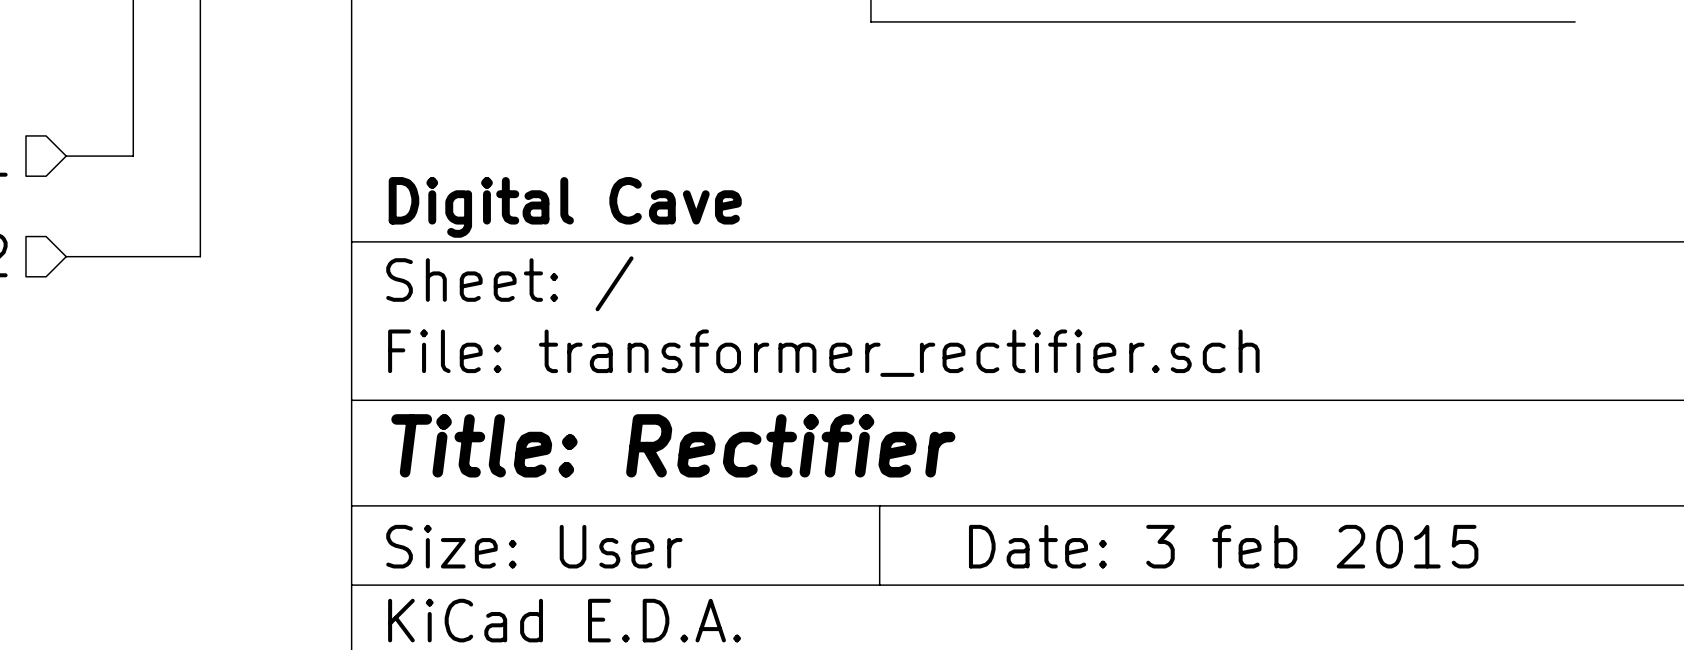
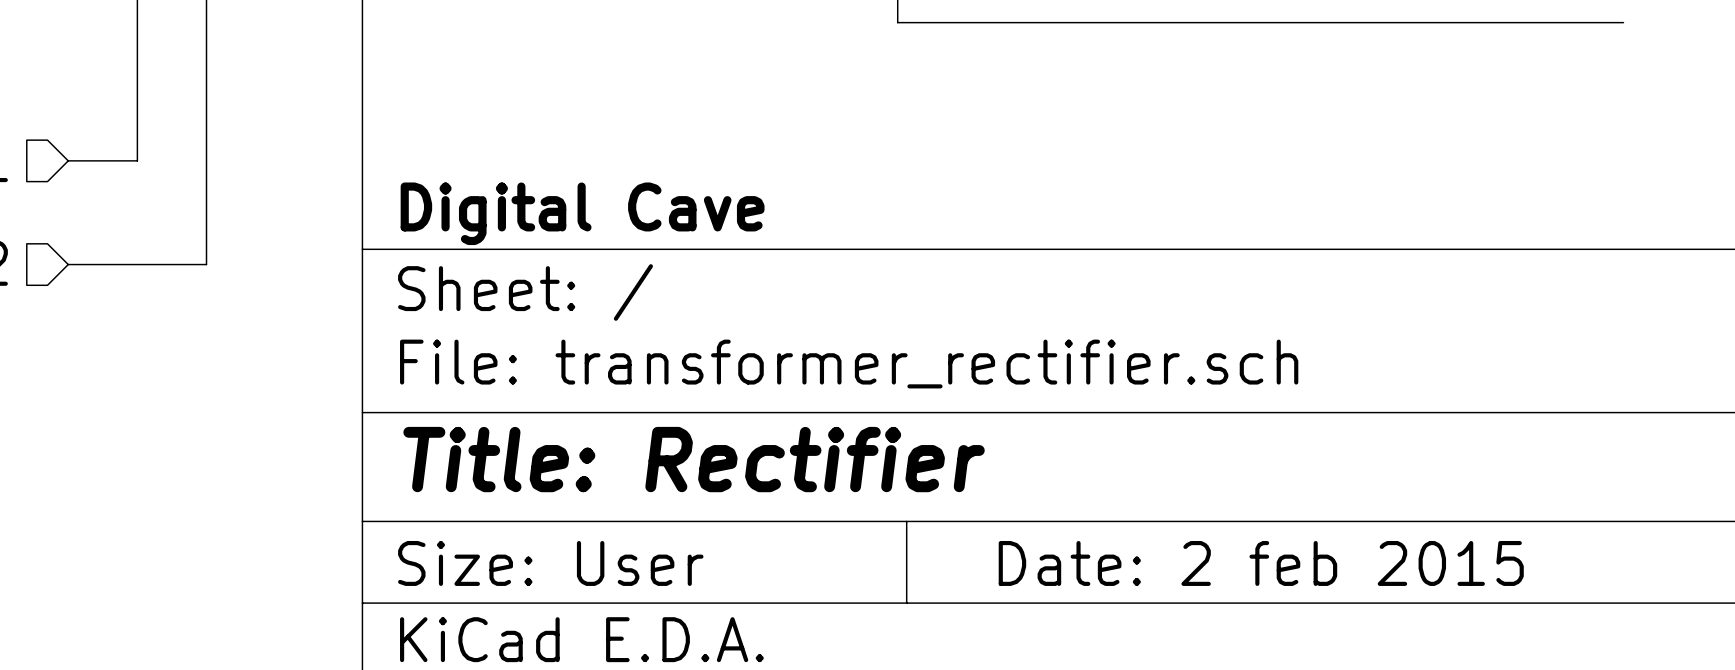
title block: Date: 3 feb 2015 (1223, 546) -> Date: 2 feb 2015 (1261, 563)

